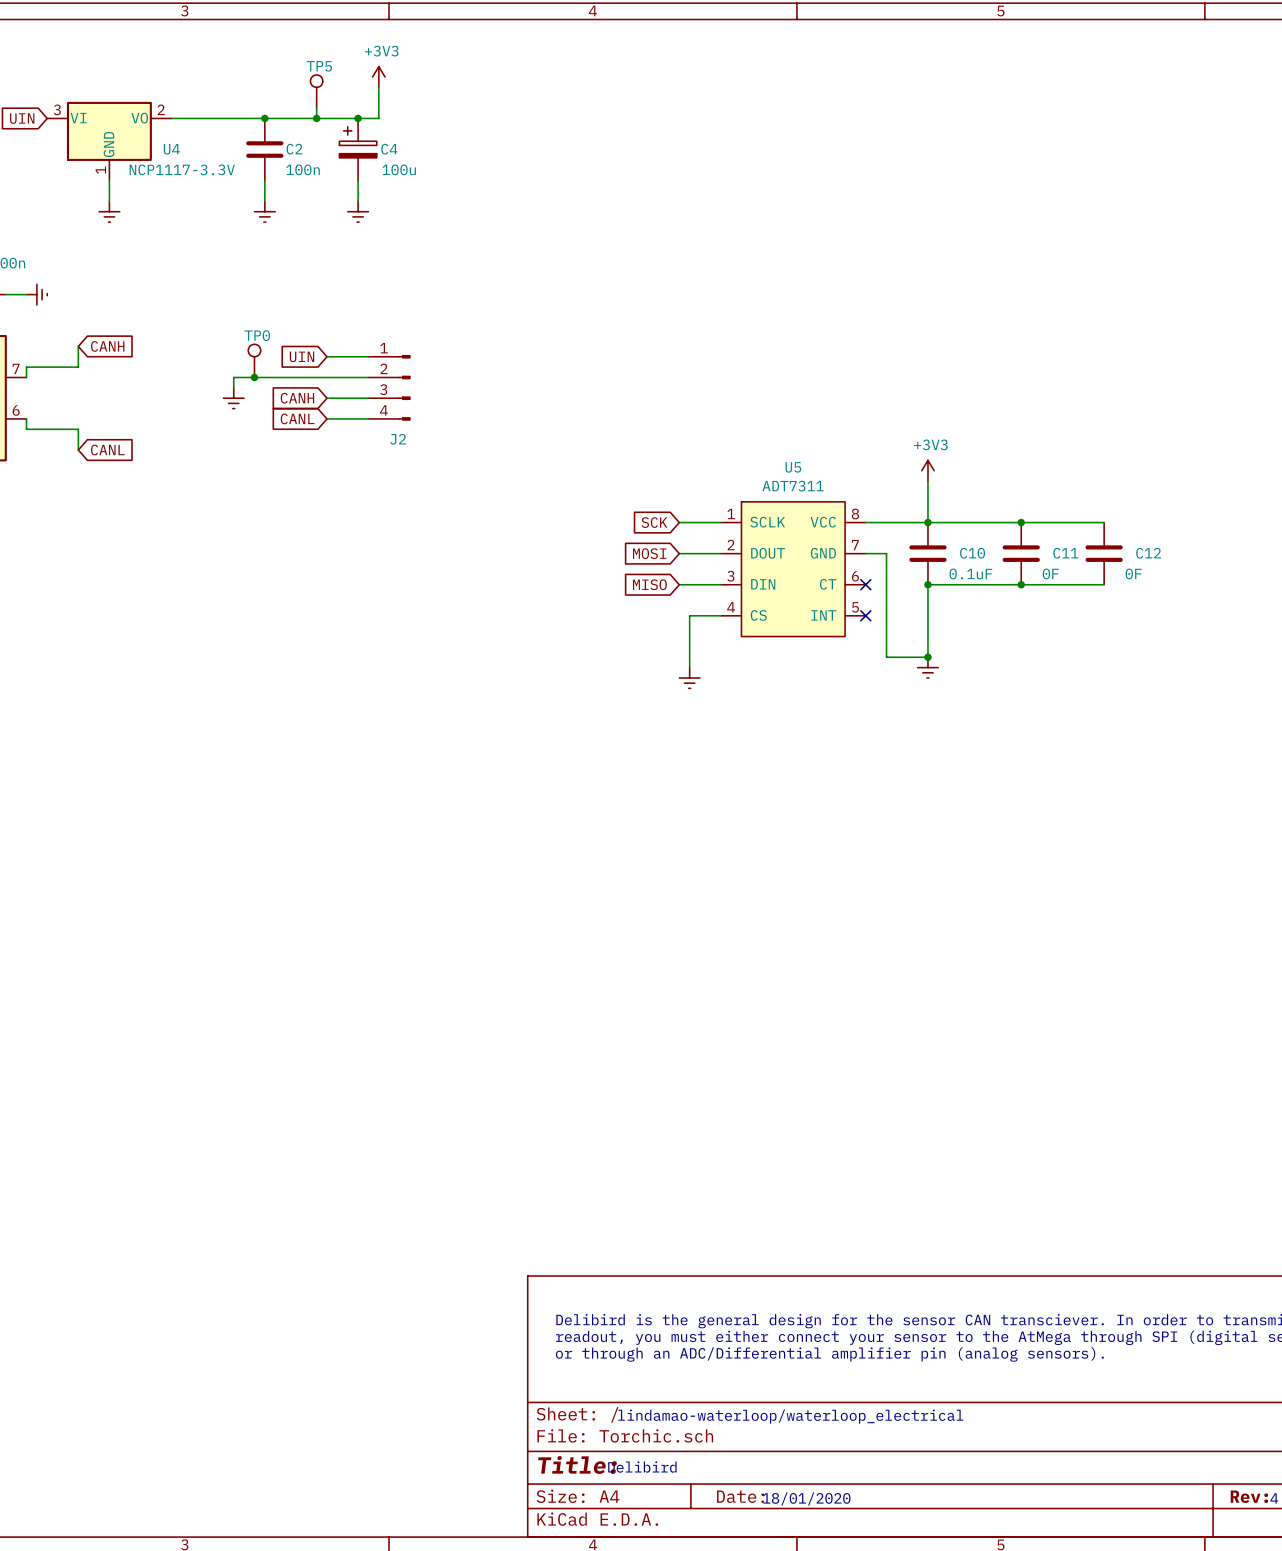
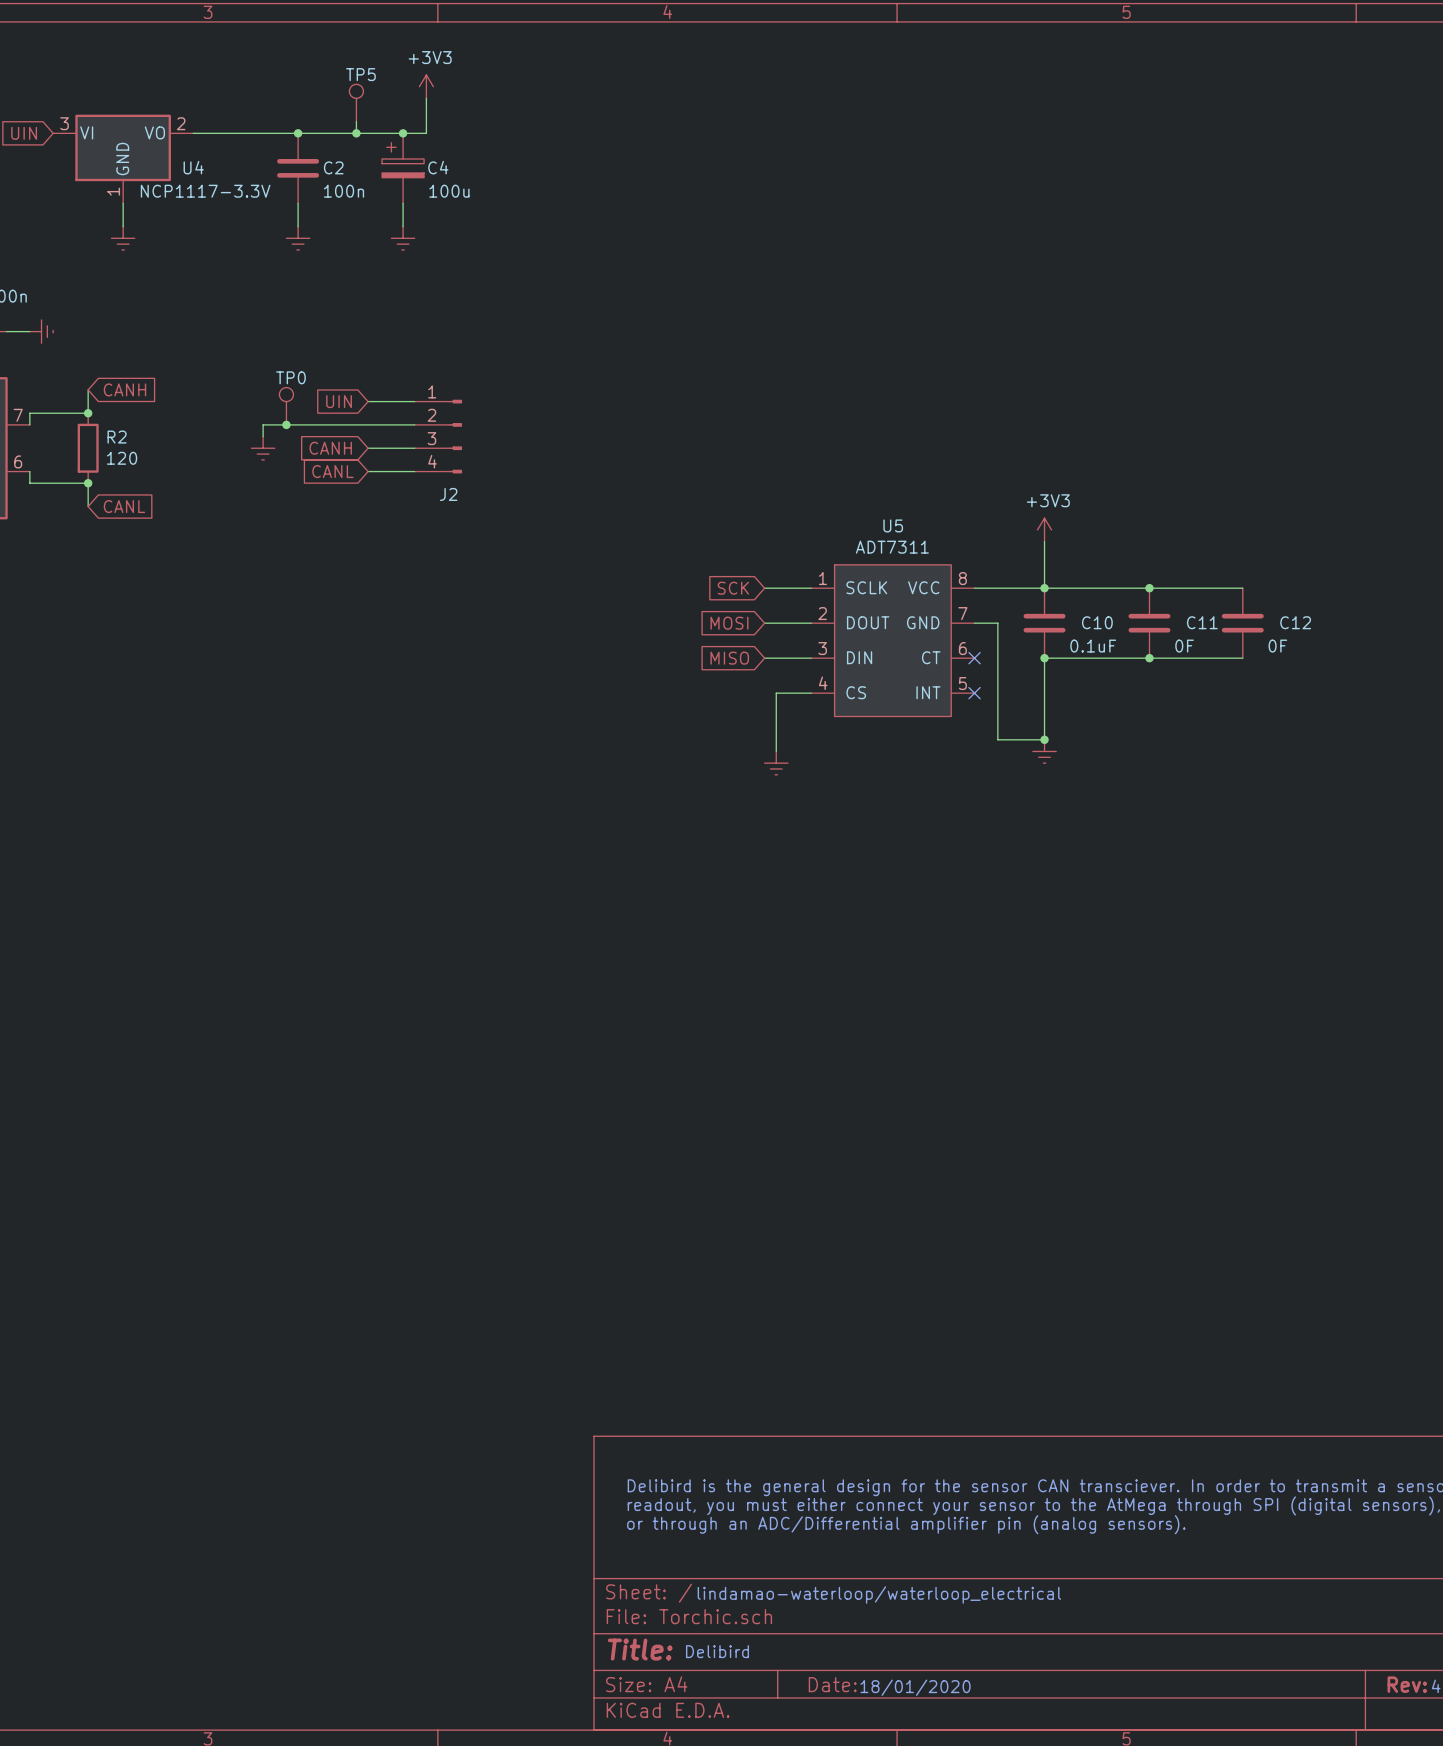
junction: none -> (88, 413)
R2: none -> 120 (88, 448)
junction: none -> (88, 483)

